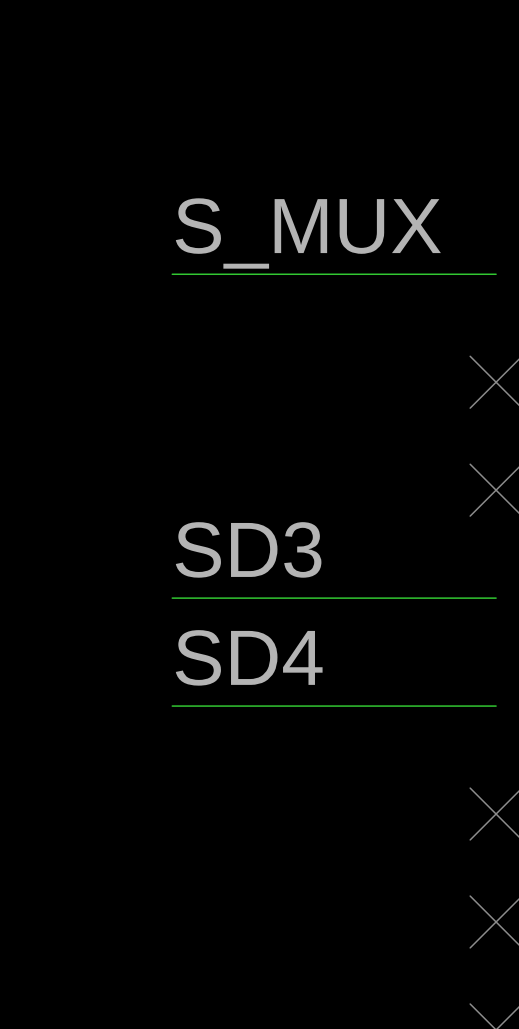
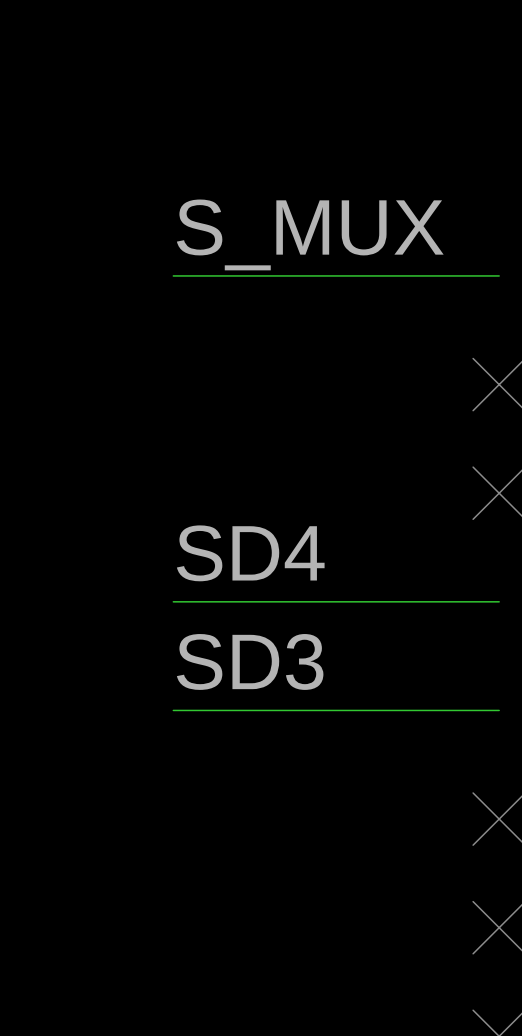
label: SD3 (248, 549) -> SD4 (250, 553)
label: SD4 (249, 657) -> SD3 (250, 661)

